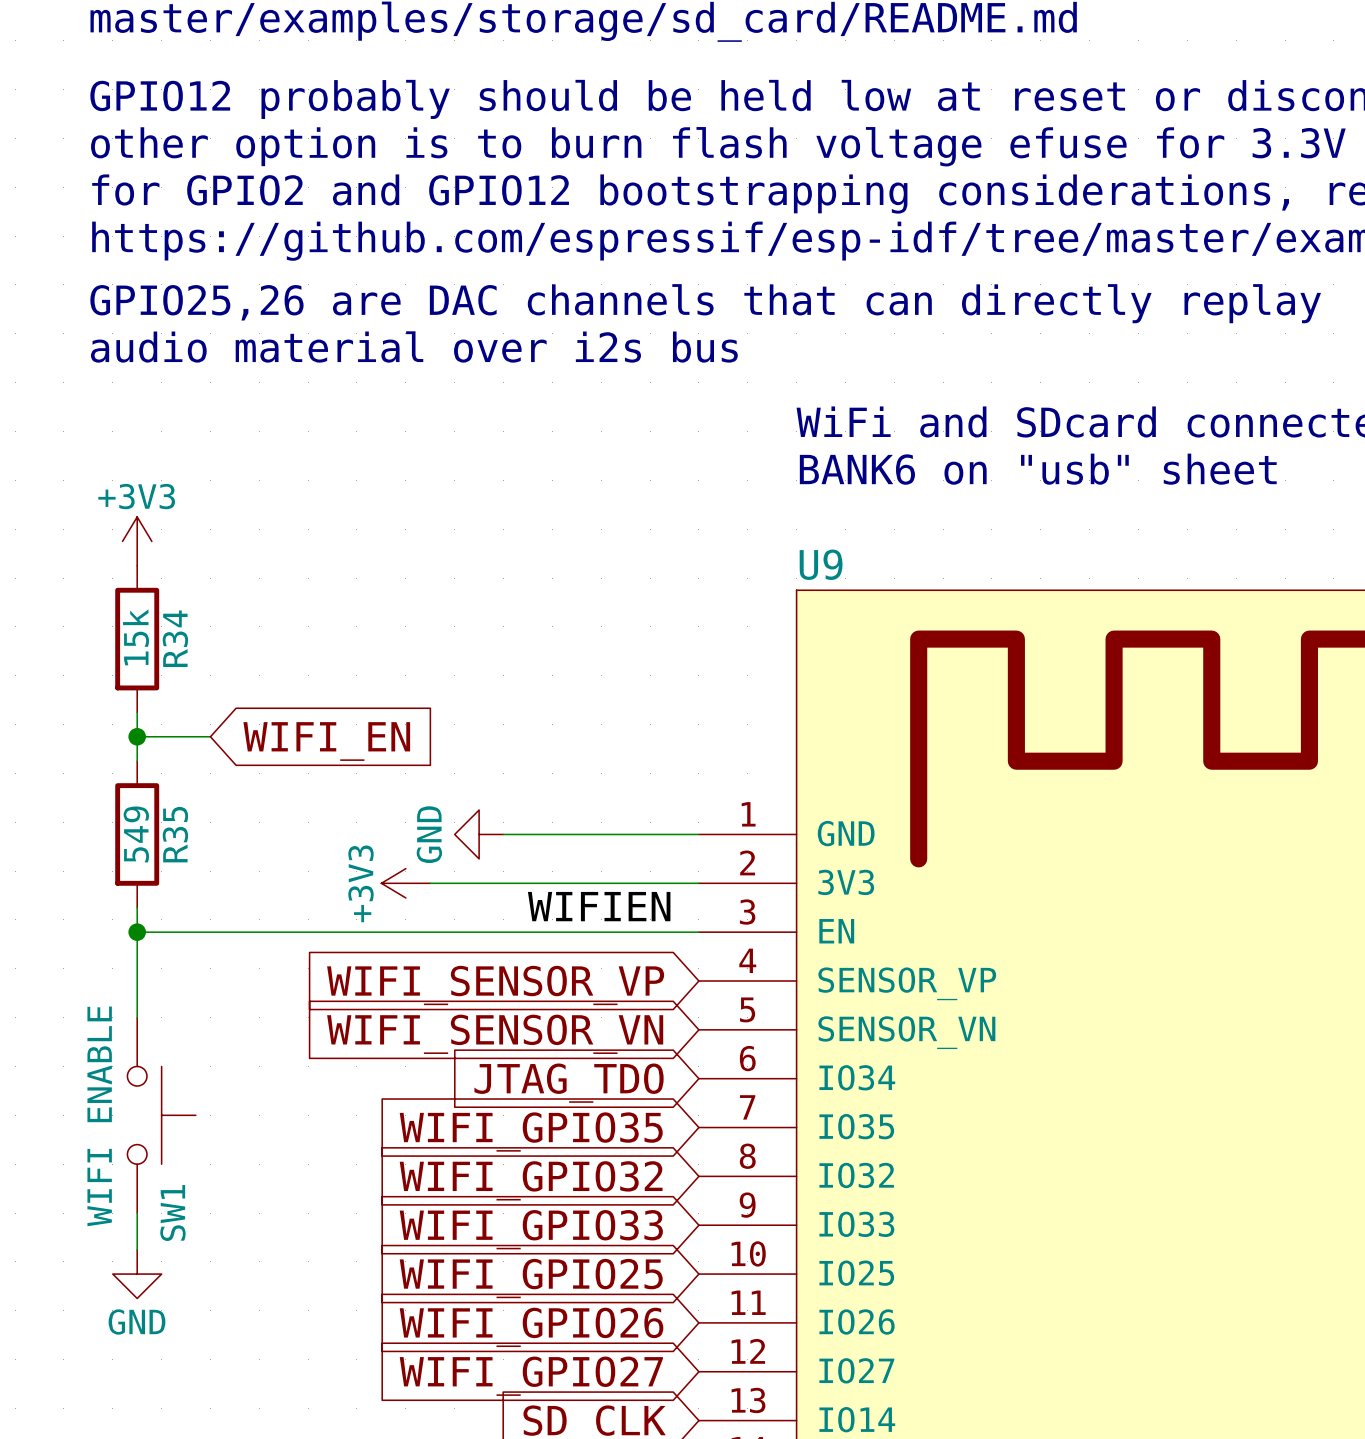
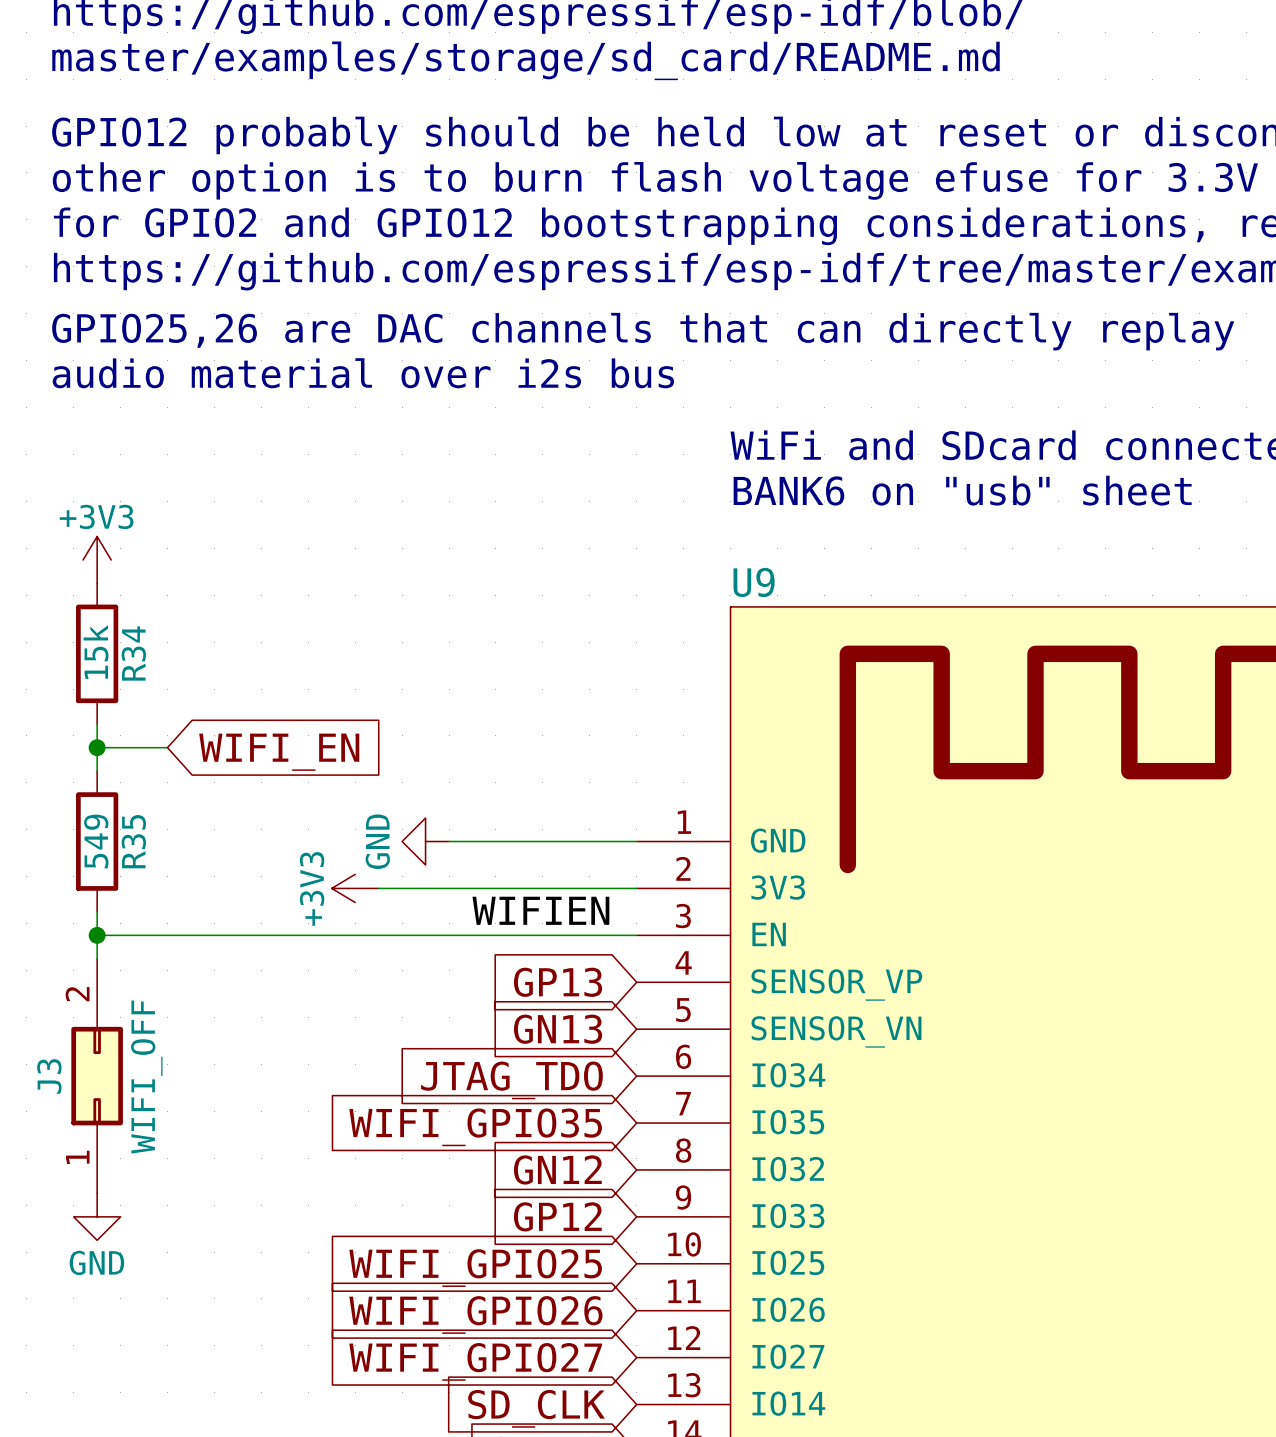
global label: WIFI_SENSOR_VP (495, 985) -> GP13 (558, 982)
global label: WIFI_SENSOR_VN (495, 1034) -> GN13 (558, 1029)
J3: none -> WIFI_OFF (97, 1076)
SW1: WIFI ENABLE (161, 1115) -> none
global label: WIFI_GPIO32 (531, 1180) -> GN12 (557, 1169)
wire: (137, 1213) (137, 1249) -> none
global label: WIFI_GPIO33 (531, 1229) -> GP12 (557, 1216)
power symbol position: GND (137, 1274) -> GND (97, 1216)

